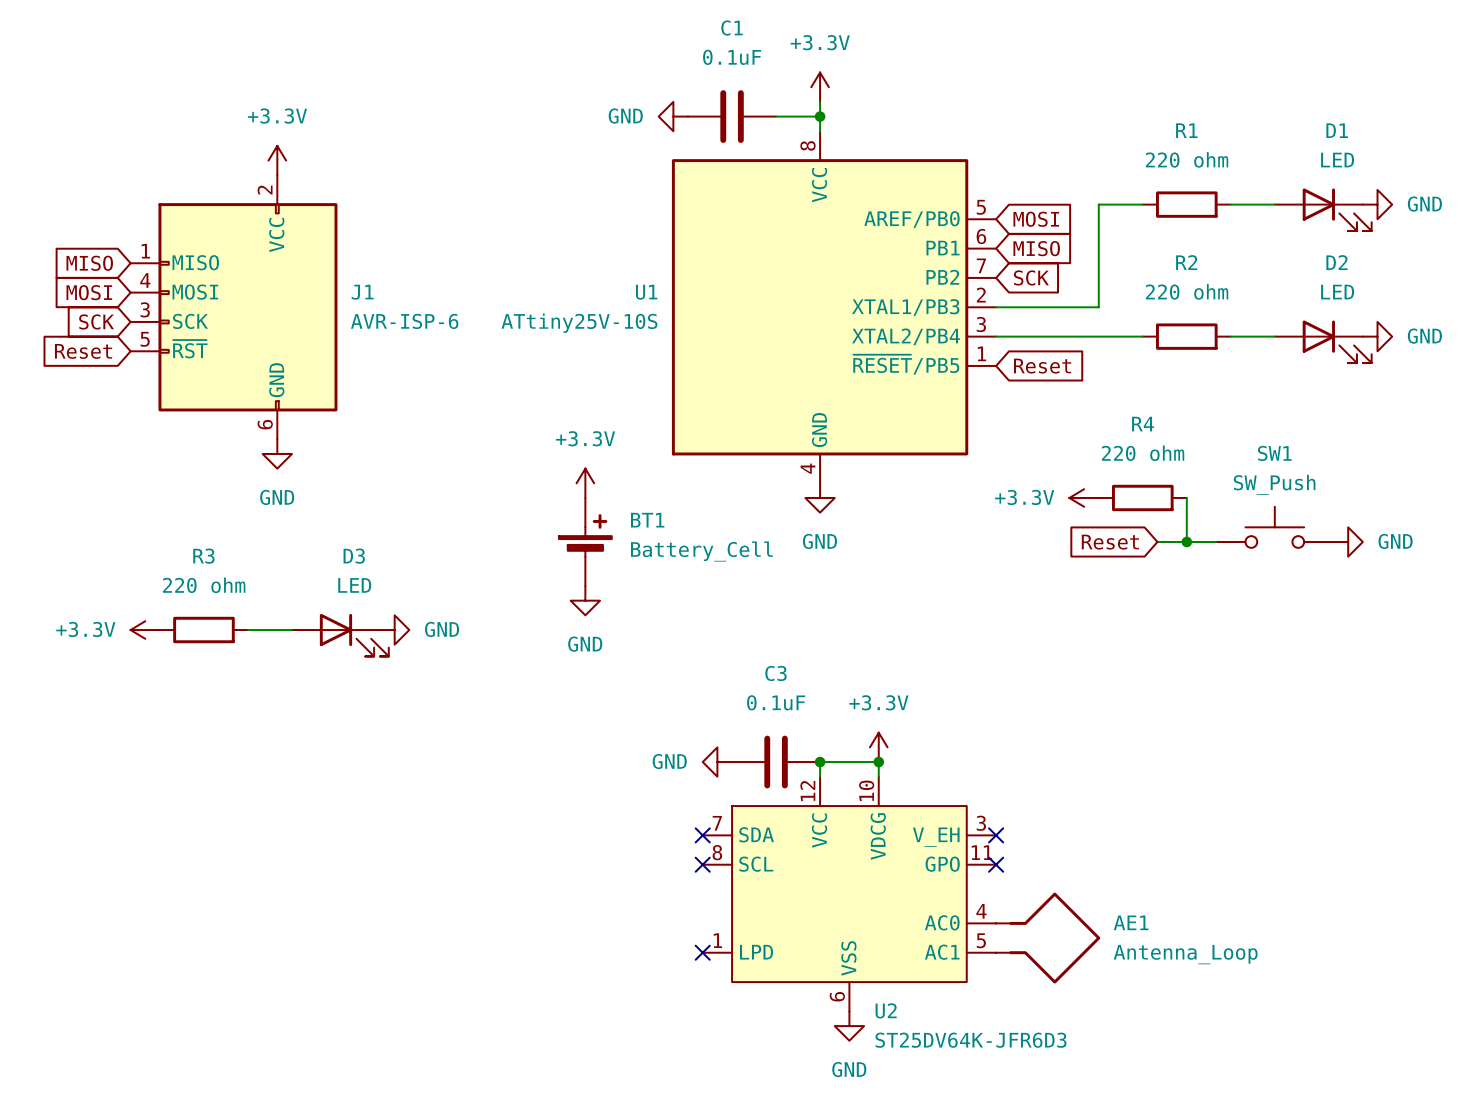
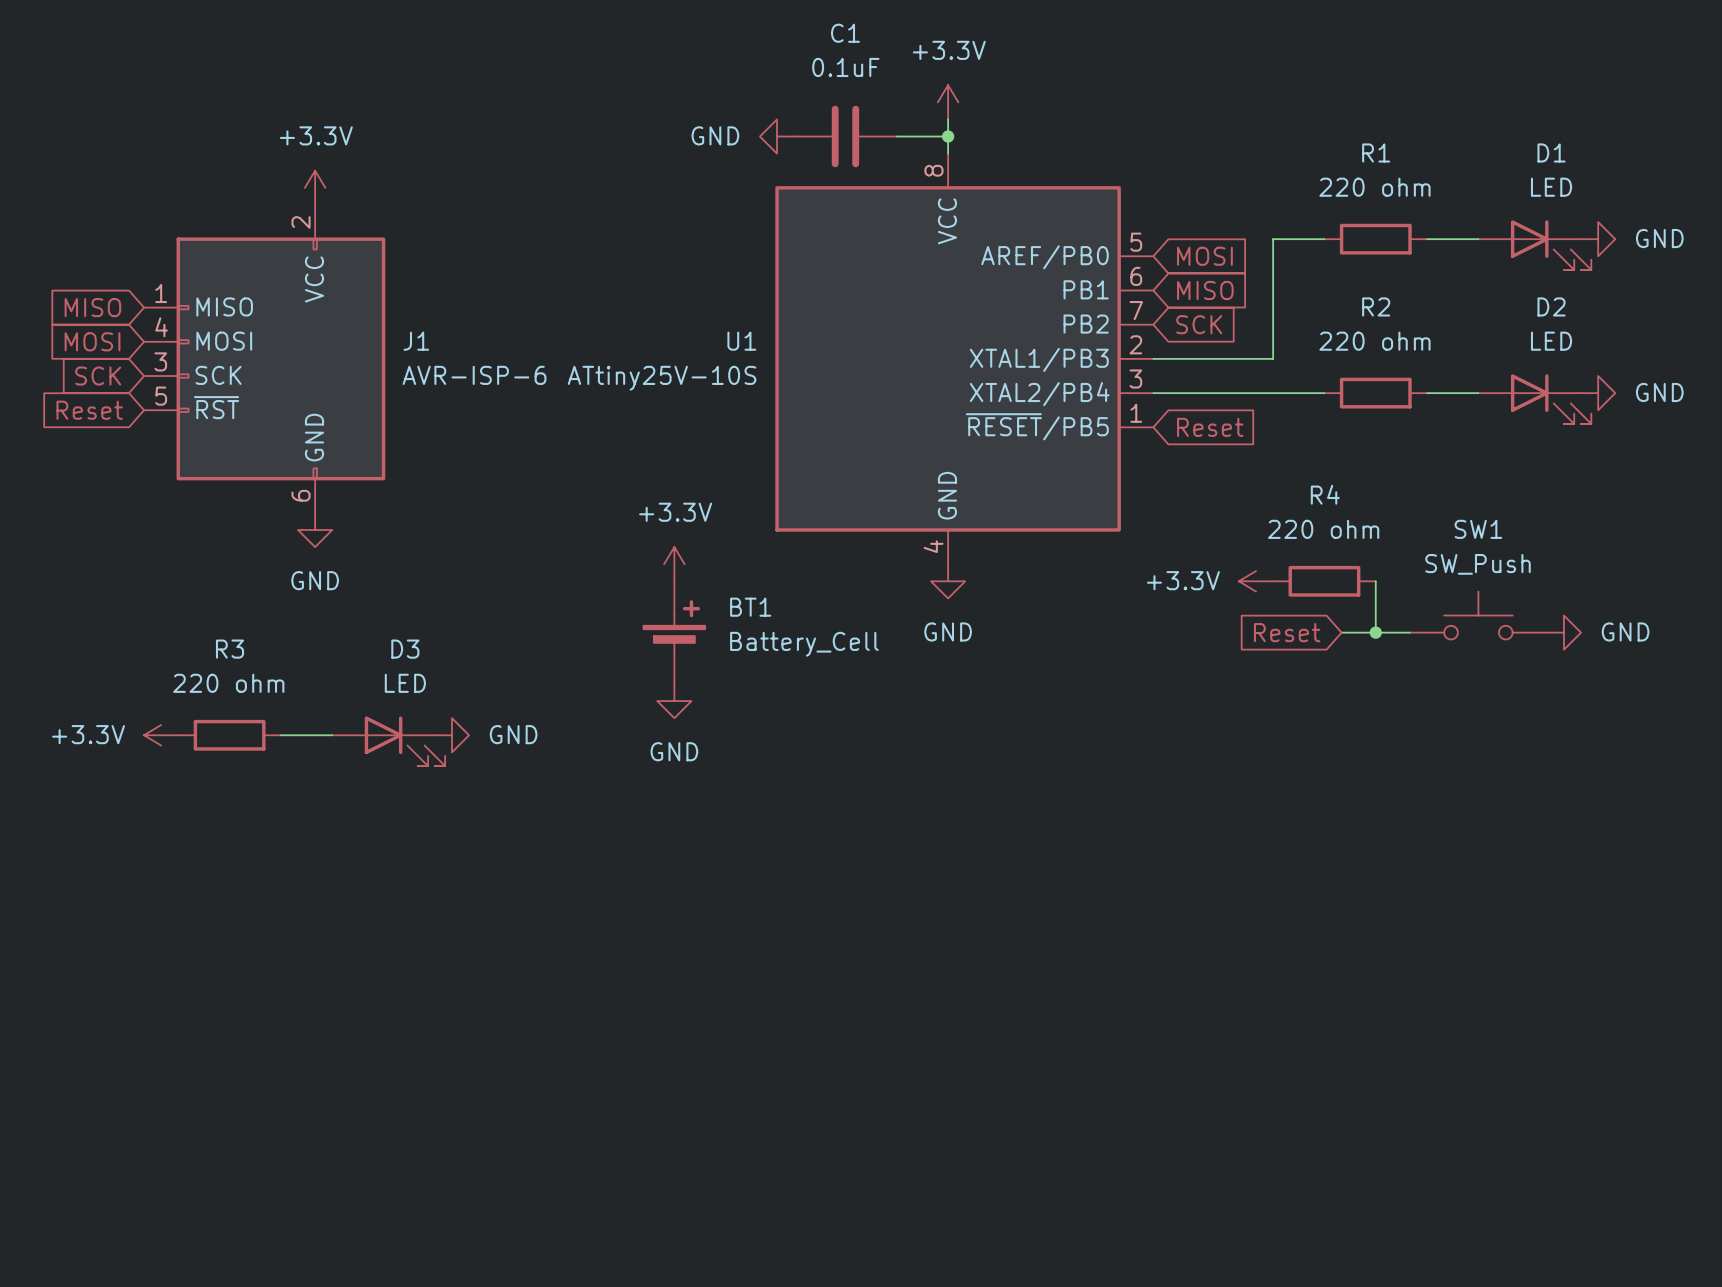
power symbol: +3.3V (878, 747) -> none
power symbol: GND (717, 762) -> none
C3: 0.1uF (776, 762) -> none
junction: (820, 762) -> none
junction: (878, 762) -> none
wire: (820, 776) (820, 762) (878, 762) (878, 776) -> none
no-connect mark: (702, 835) -> none
no-connect mark: (996, 835) -> none
no-connect mark: (702, 864) -> none
no-connect mark: (996, 864) -> none
U2: ST25DV64K-JFR6D3 (849, 894) -> none
AE1: Antenna_Loop (1048, 938) -> none
no-connect mark: (702, 952) -> none
power symbol: GND (849, 1026) -> none

